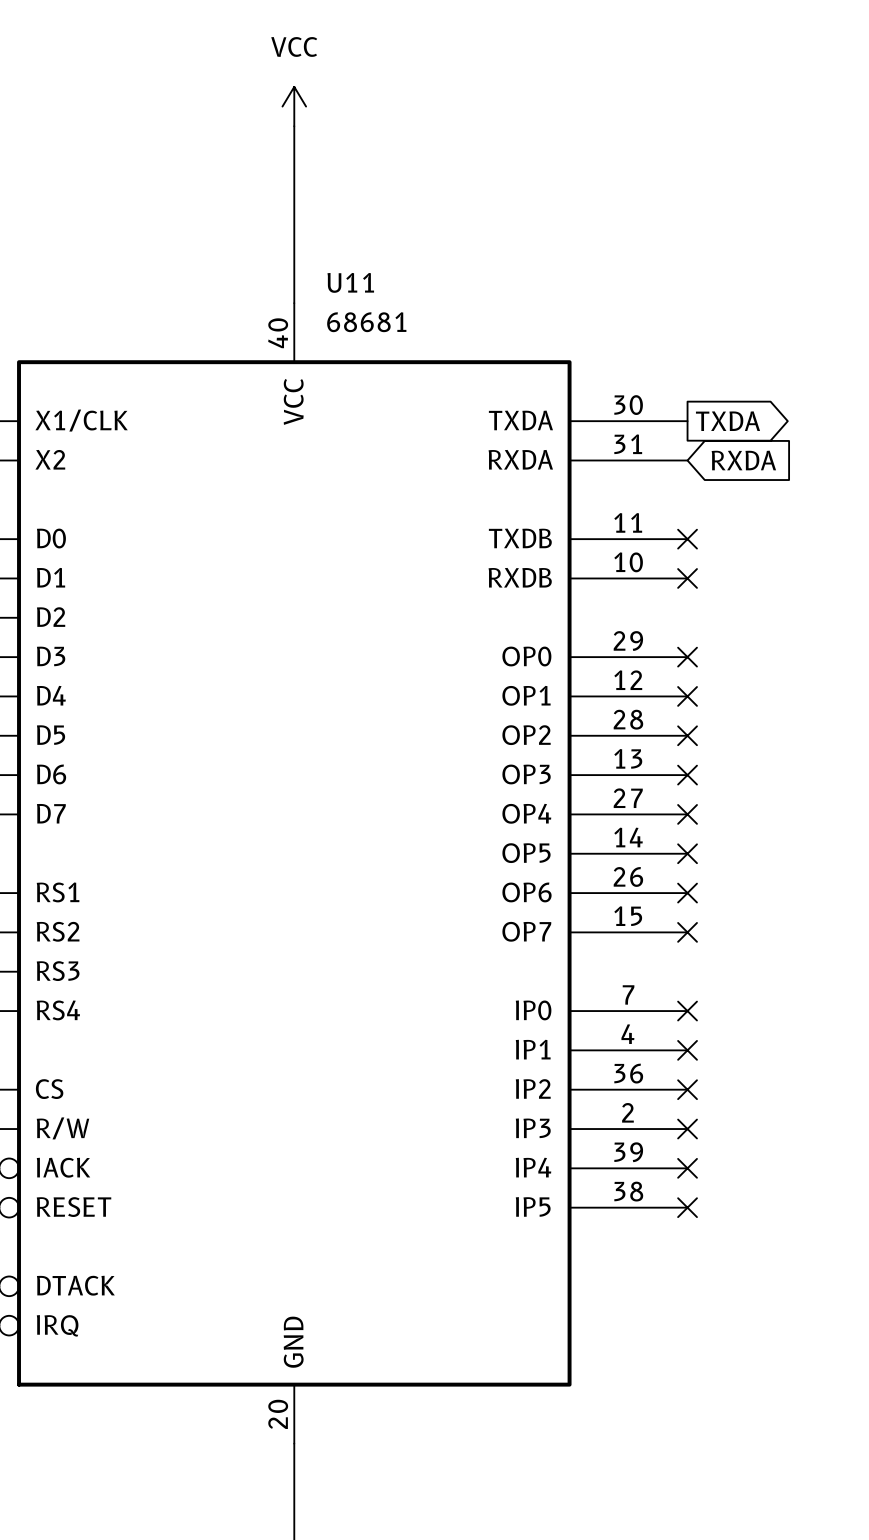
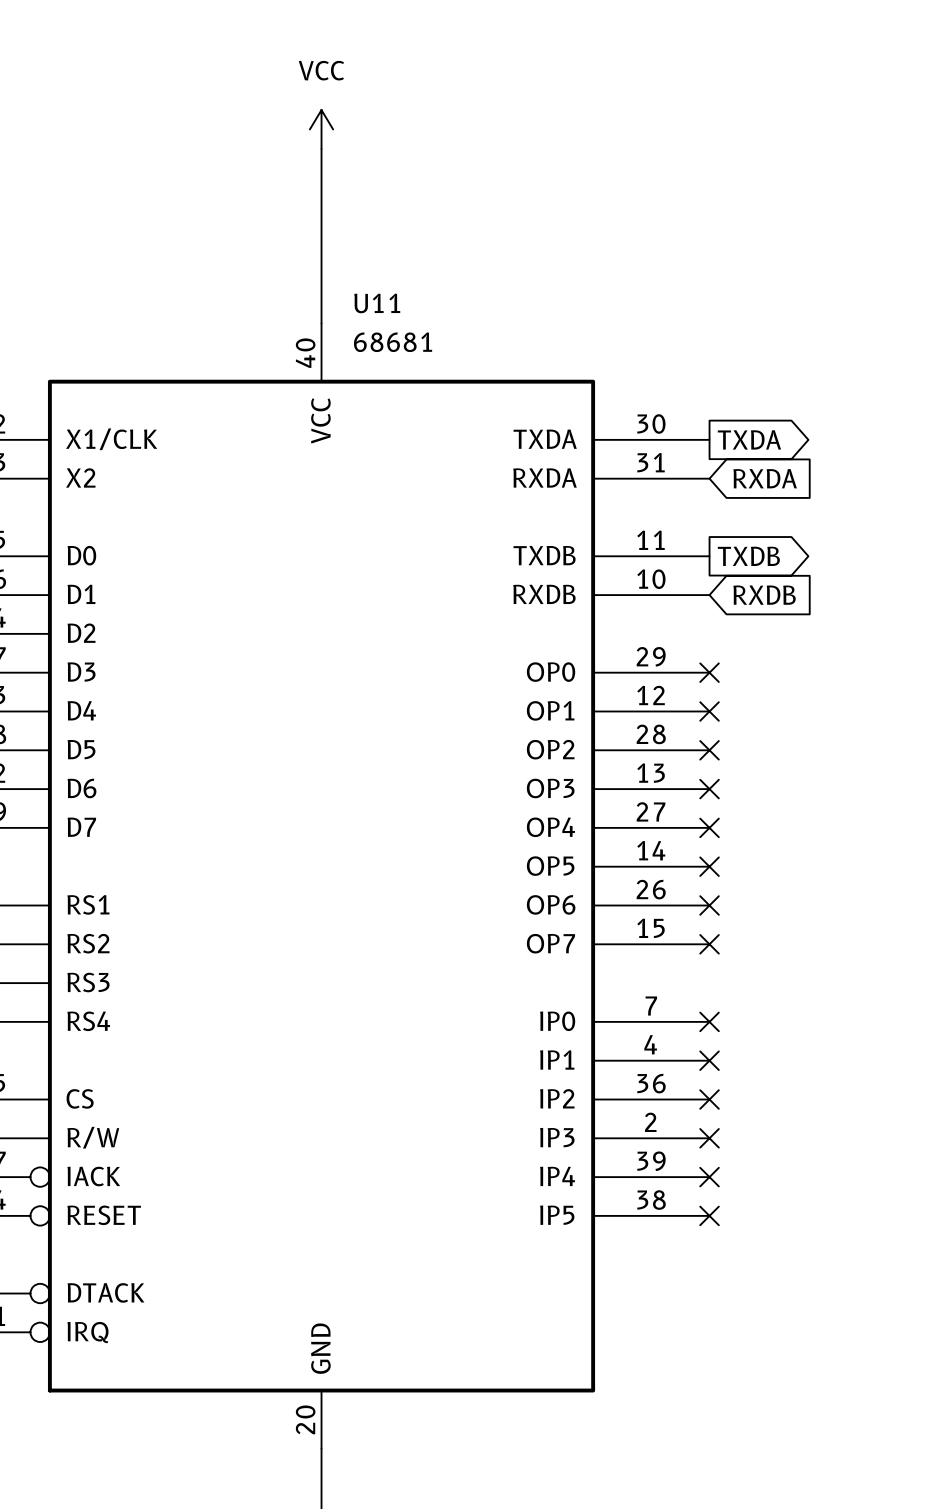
no-connect mark: (687, 539) -> none
global label: none -> TXDB (748, 556)
no-connect mark: (687, 578) -> none
global label: none -> RXDB (764, 595)

